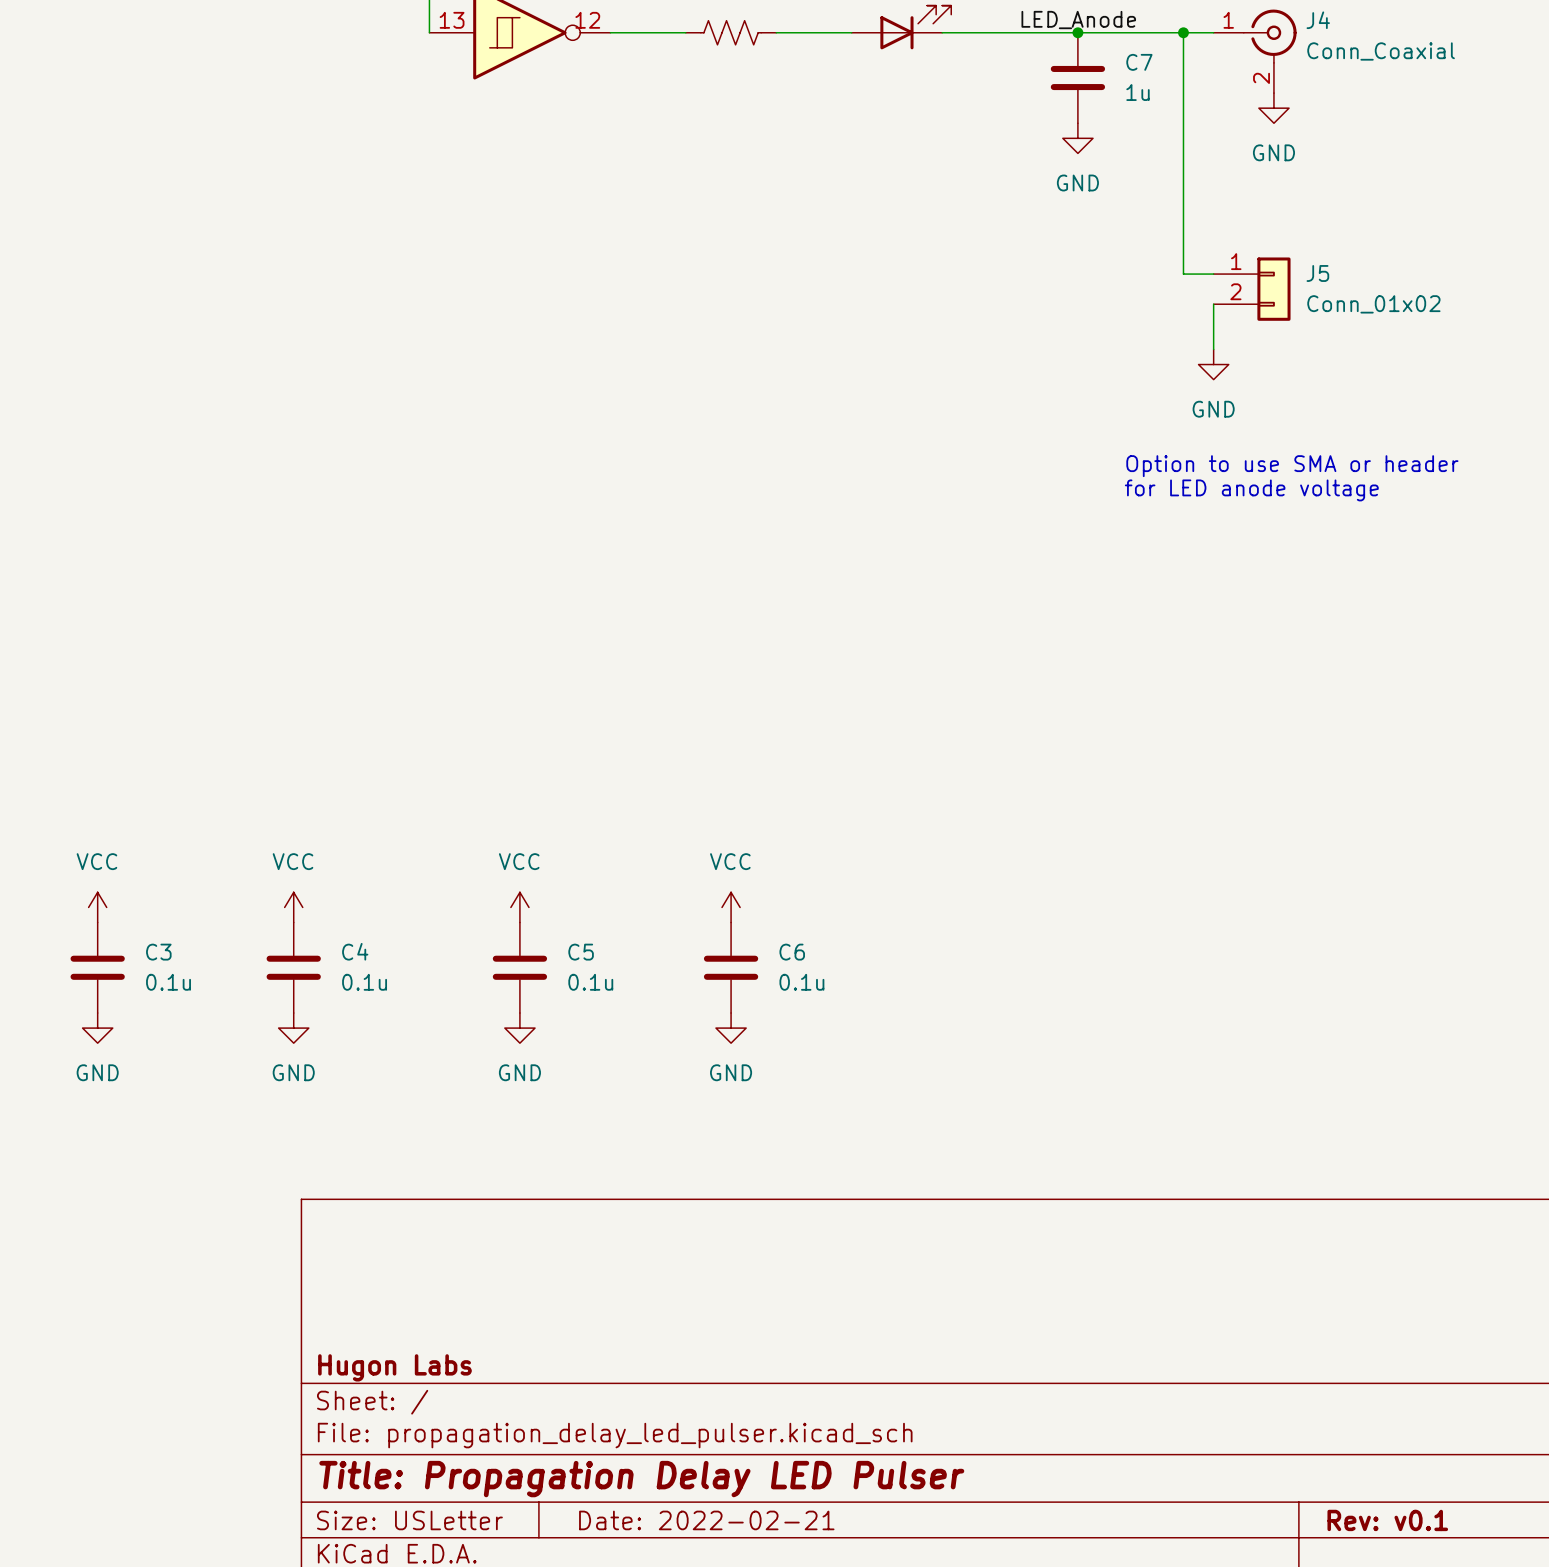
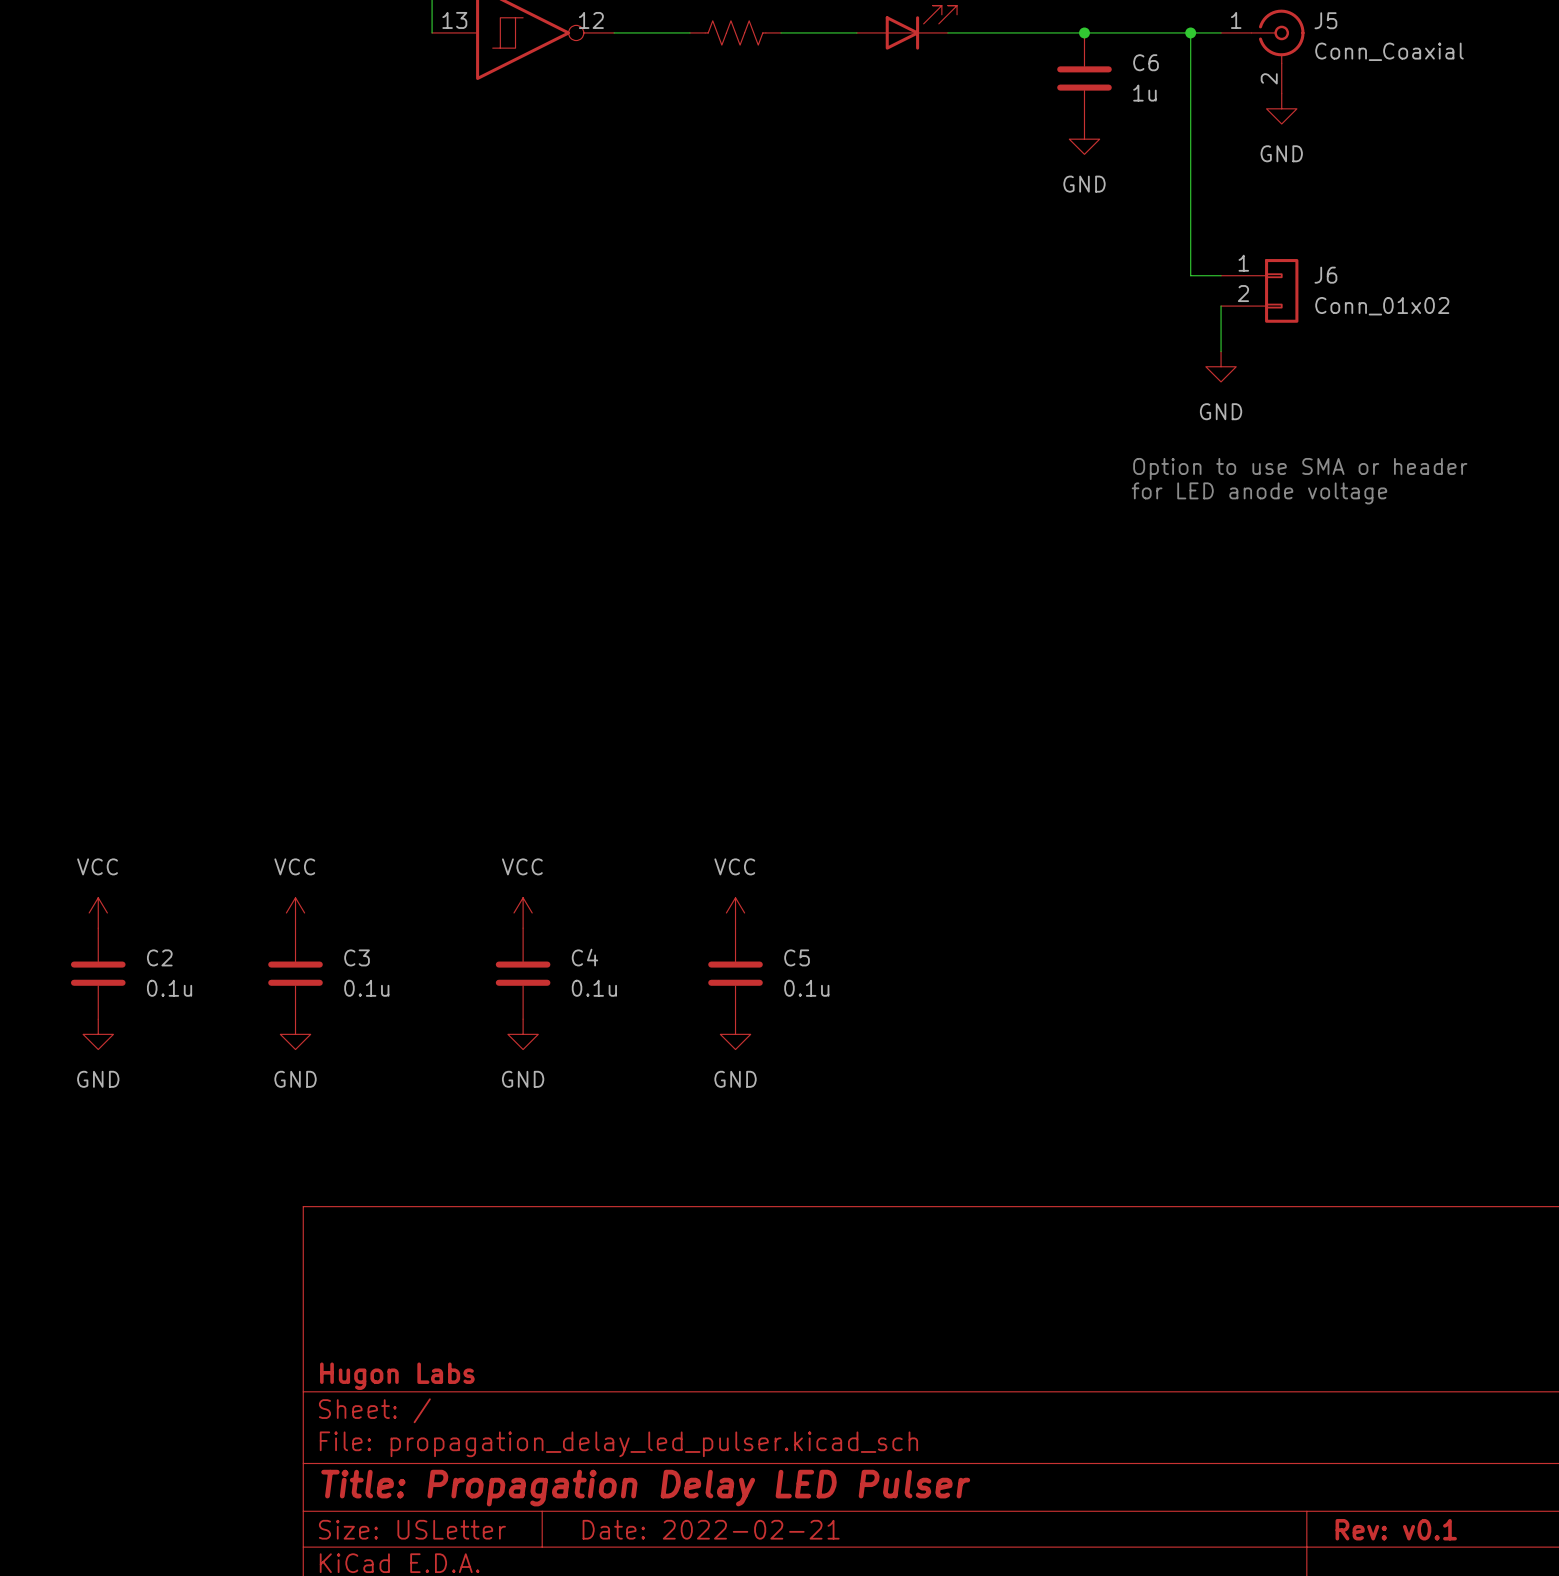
label: LED_Anode (1078, 20) -> none
J4 name: J4 (1318, 20) -> J5 (1325, 20)
C7 name: C7 (1139, 62) -> C6 (1146, 62)
J5 name: J5 (1317, 273) -> J6 (1325, 275)
C4 name: C4 (355, 951) -> C3 (357, 957)
C3 name: C3 (158, 952) -> C2 (159, 957)
C5 name: C5 (581, 952) -> C4 (584, 957)
C6 name: C6 (792, 952) -> C5 (797, 957)

